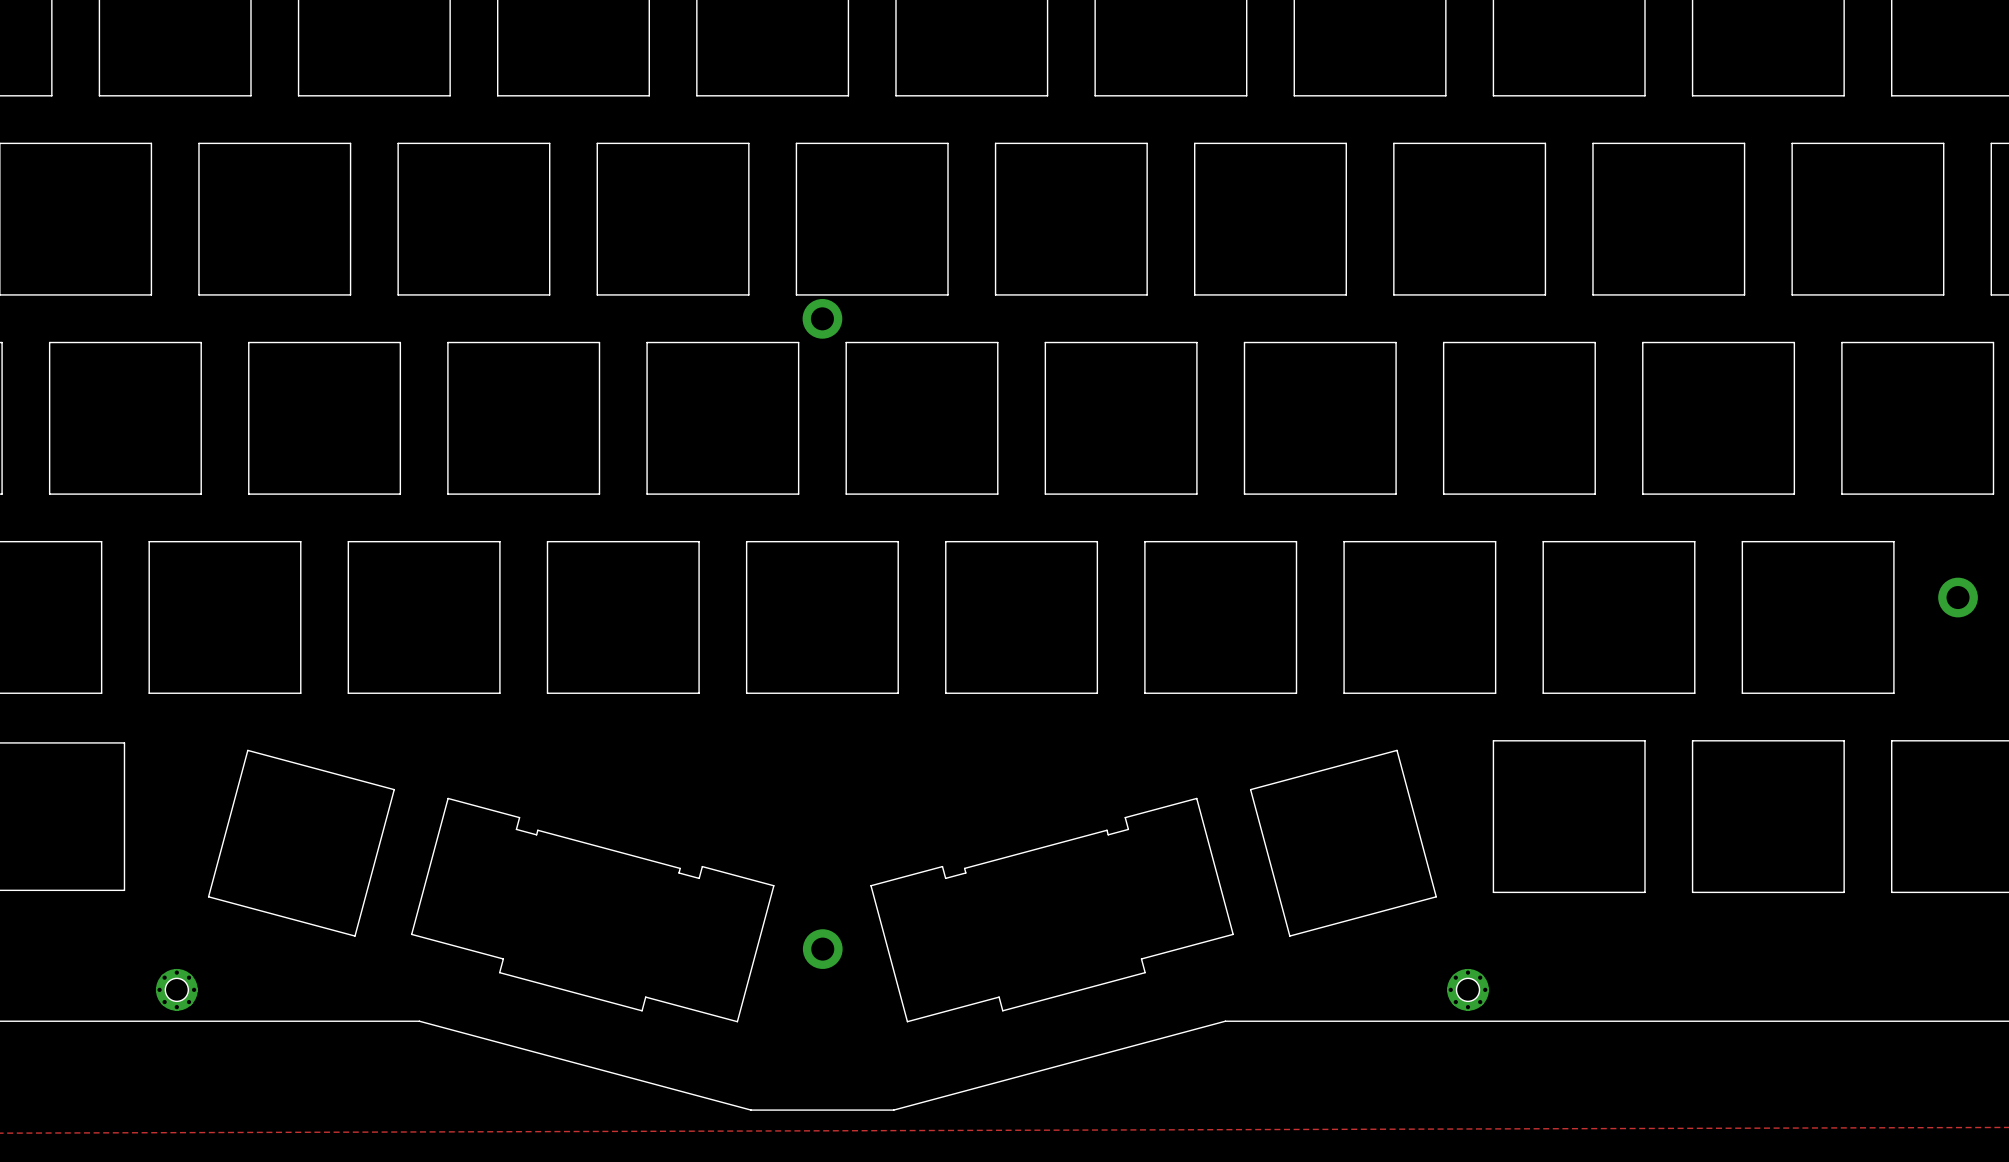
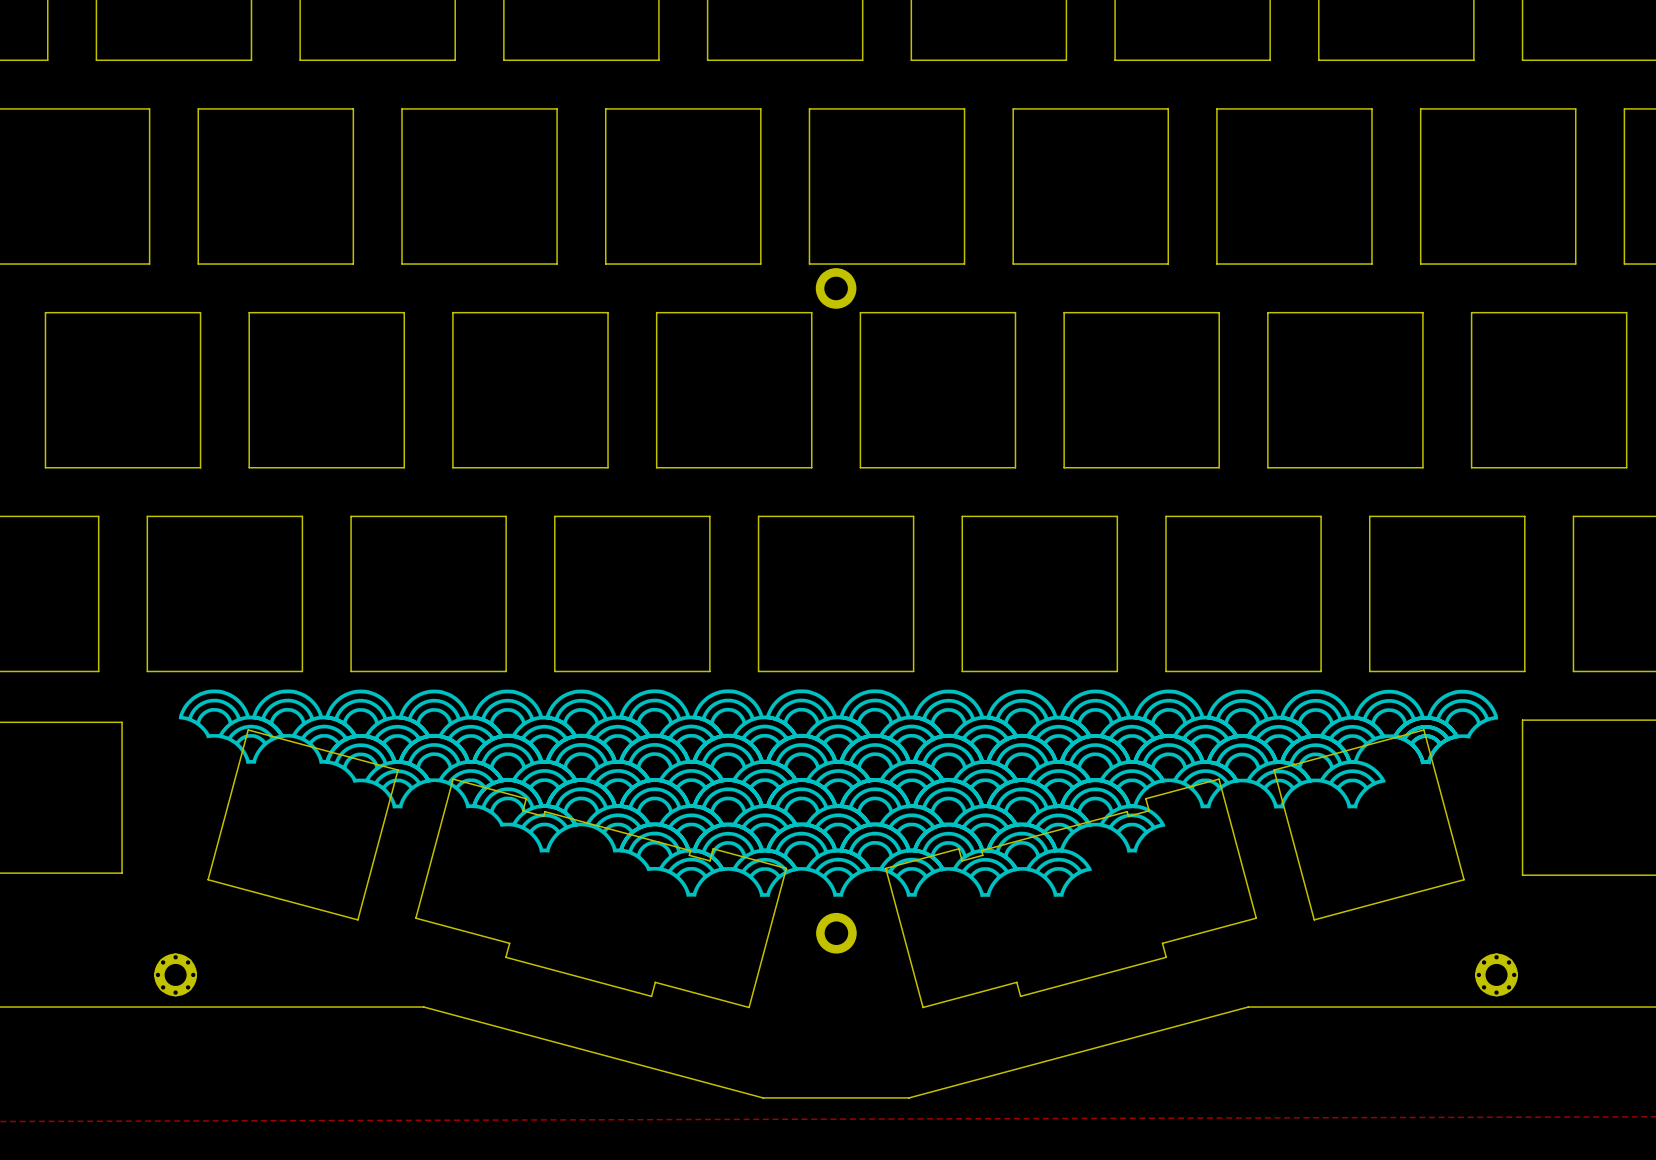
drawing: none -> [178, 689, 1499, 898]

